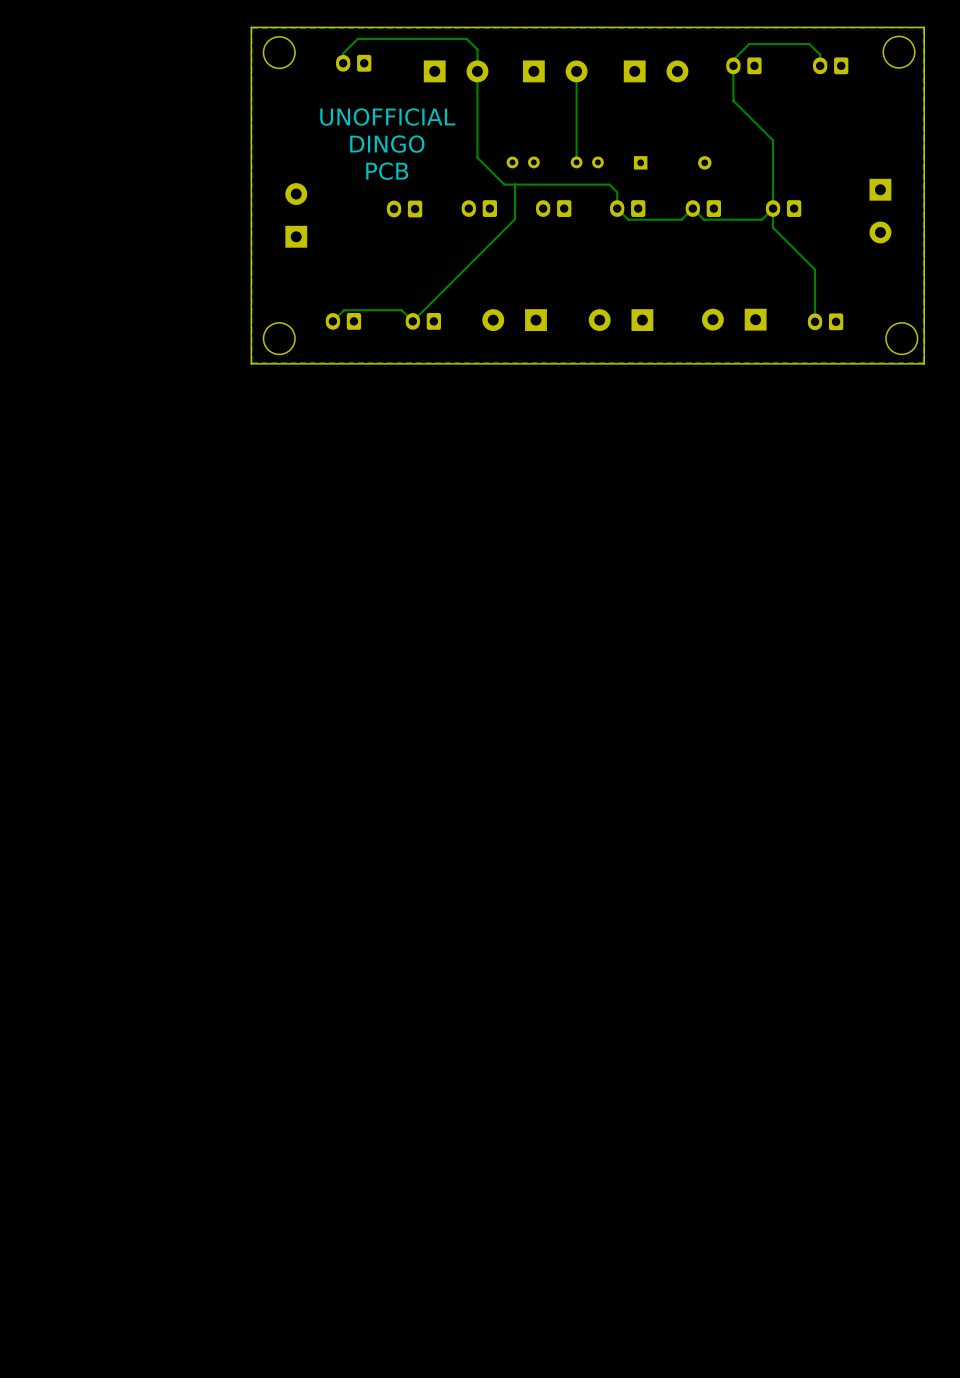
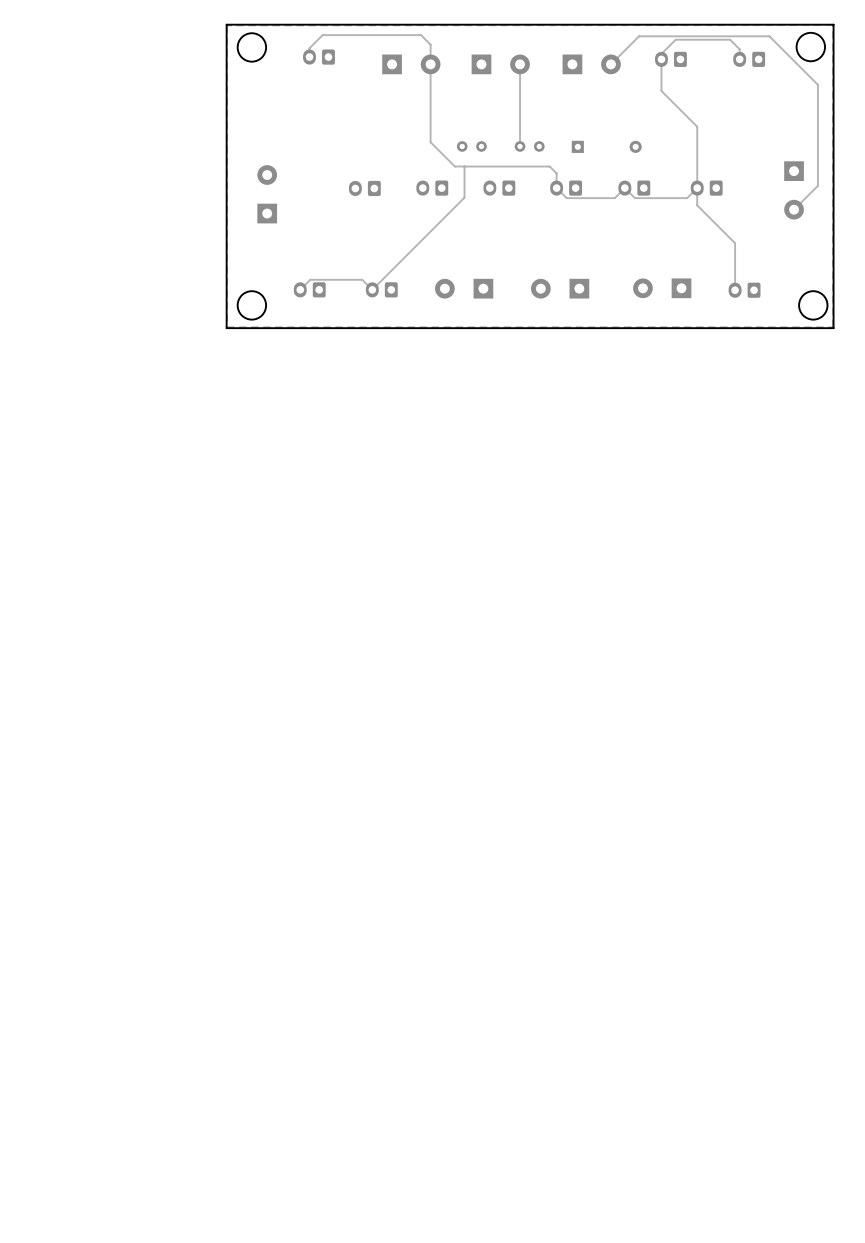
track: none -> (610, 64) (639, 36) (769, 36) (817, 84) (817, 185) (794, 209)
text: UNOFFICIAL (387, 117) -> none
text: DINGO (387, 144) -> none
text: PCB (387, 171) -> none

